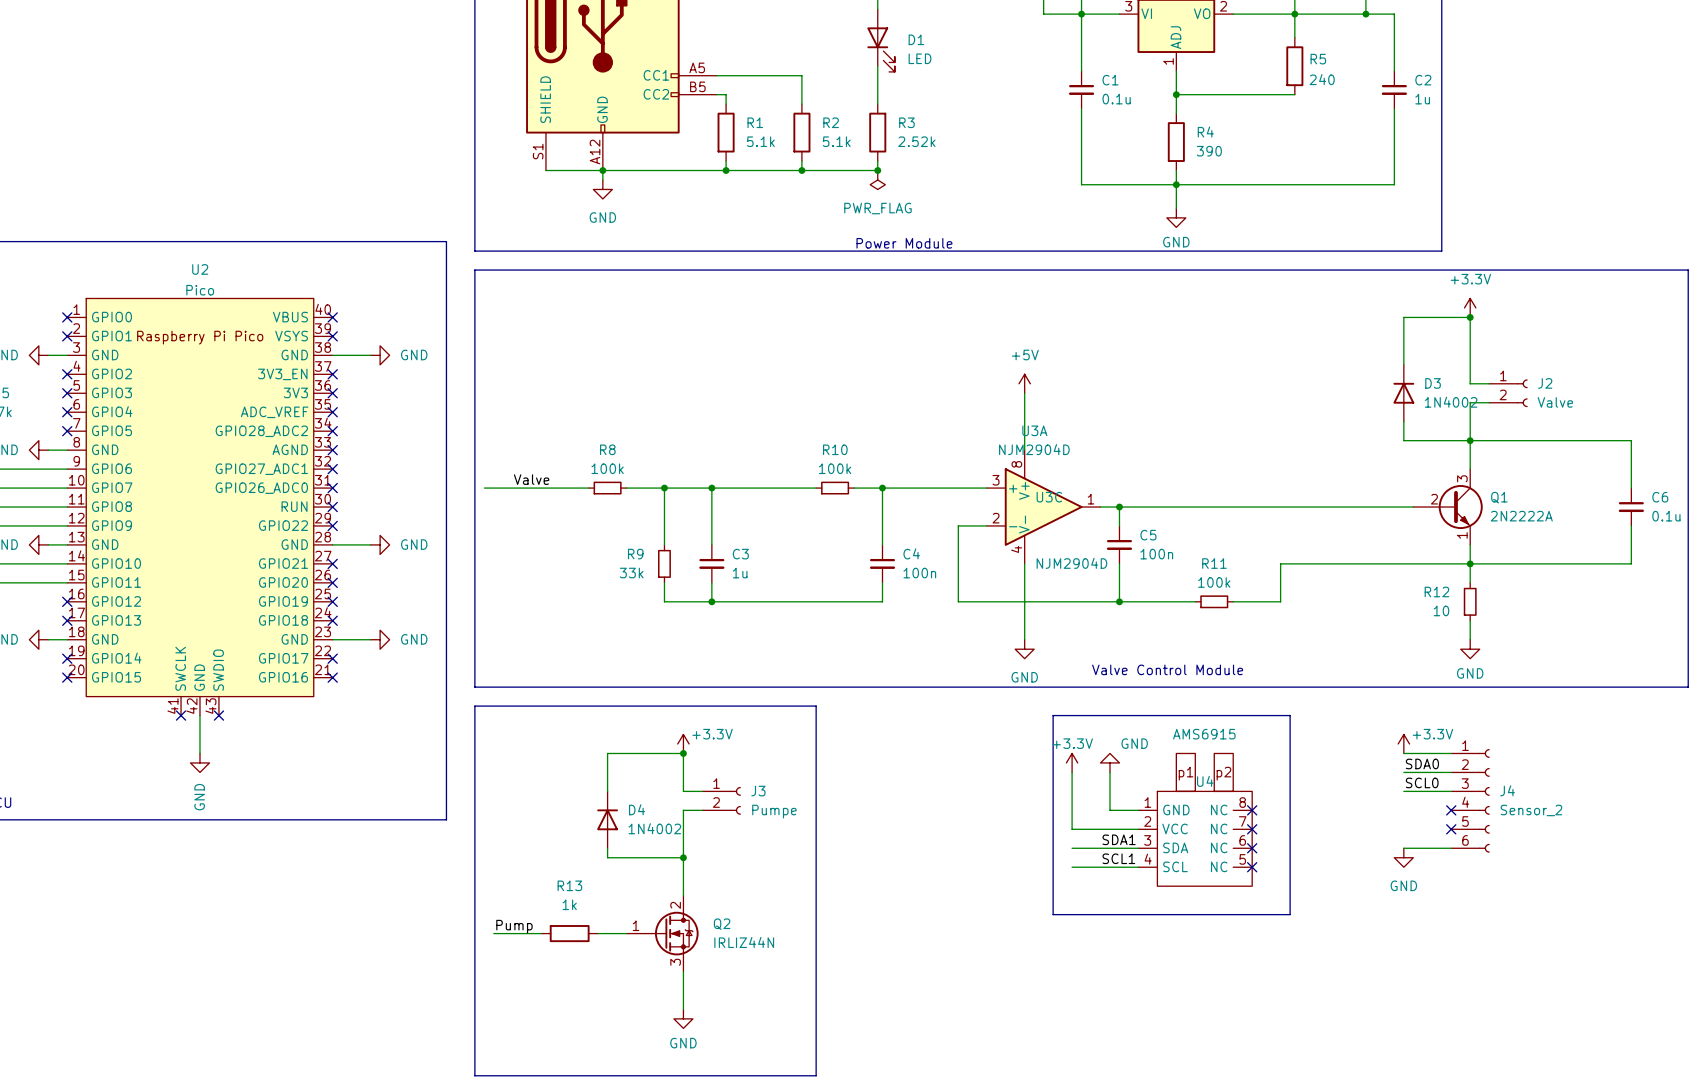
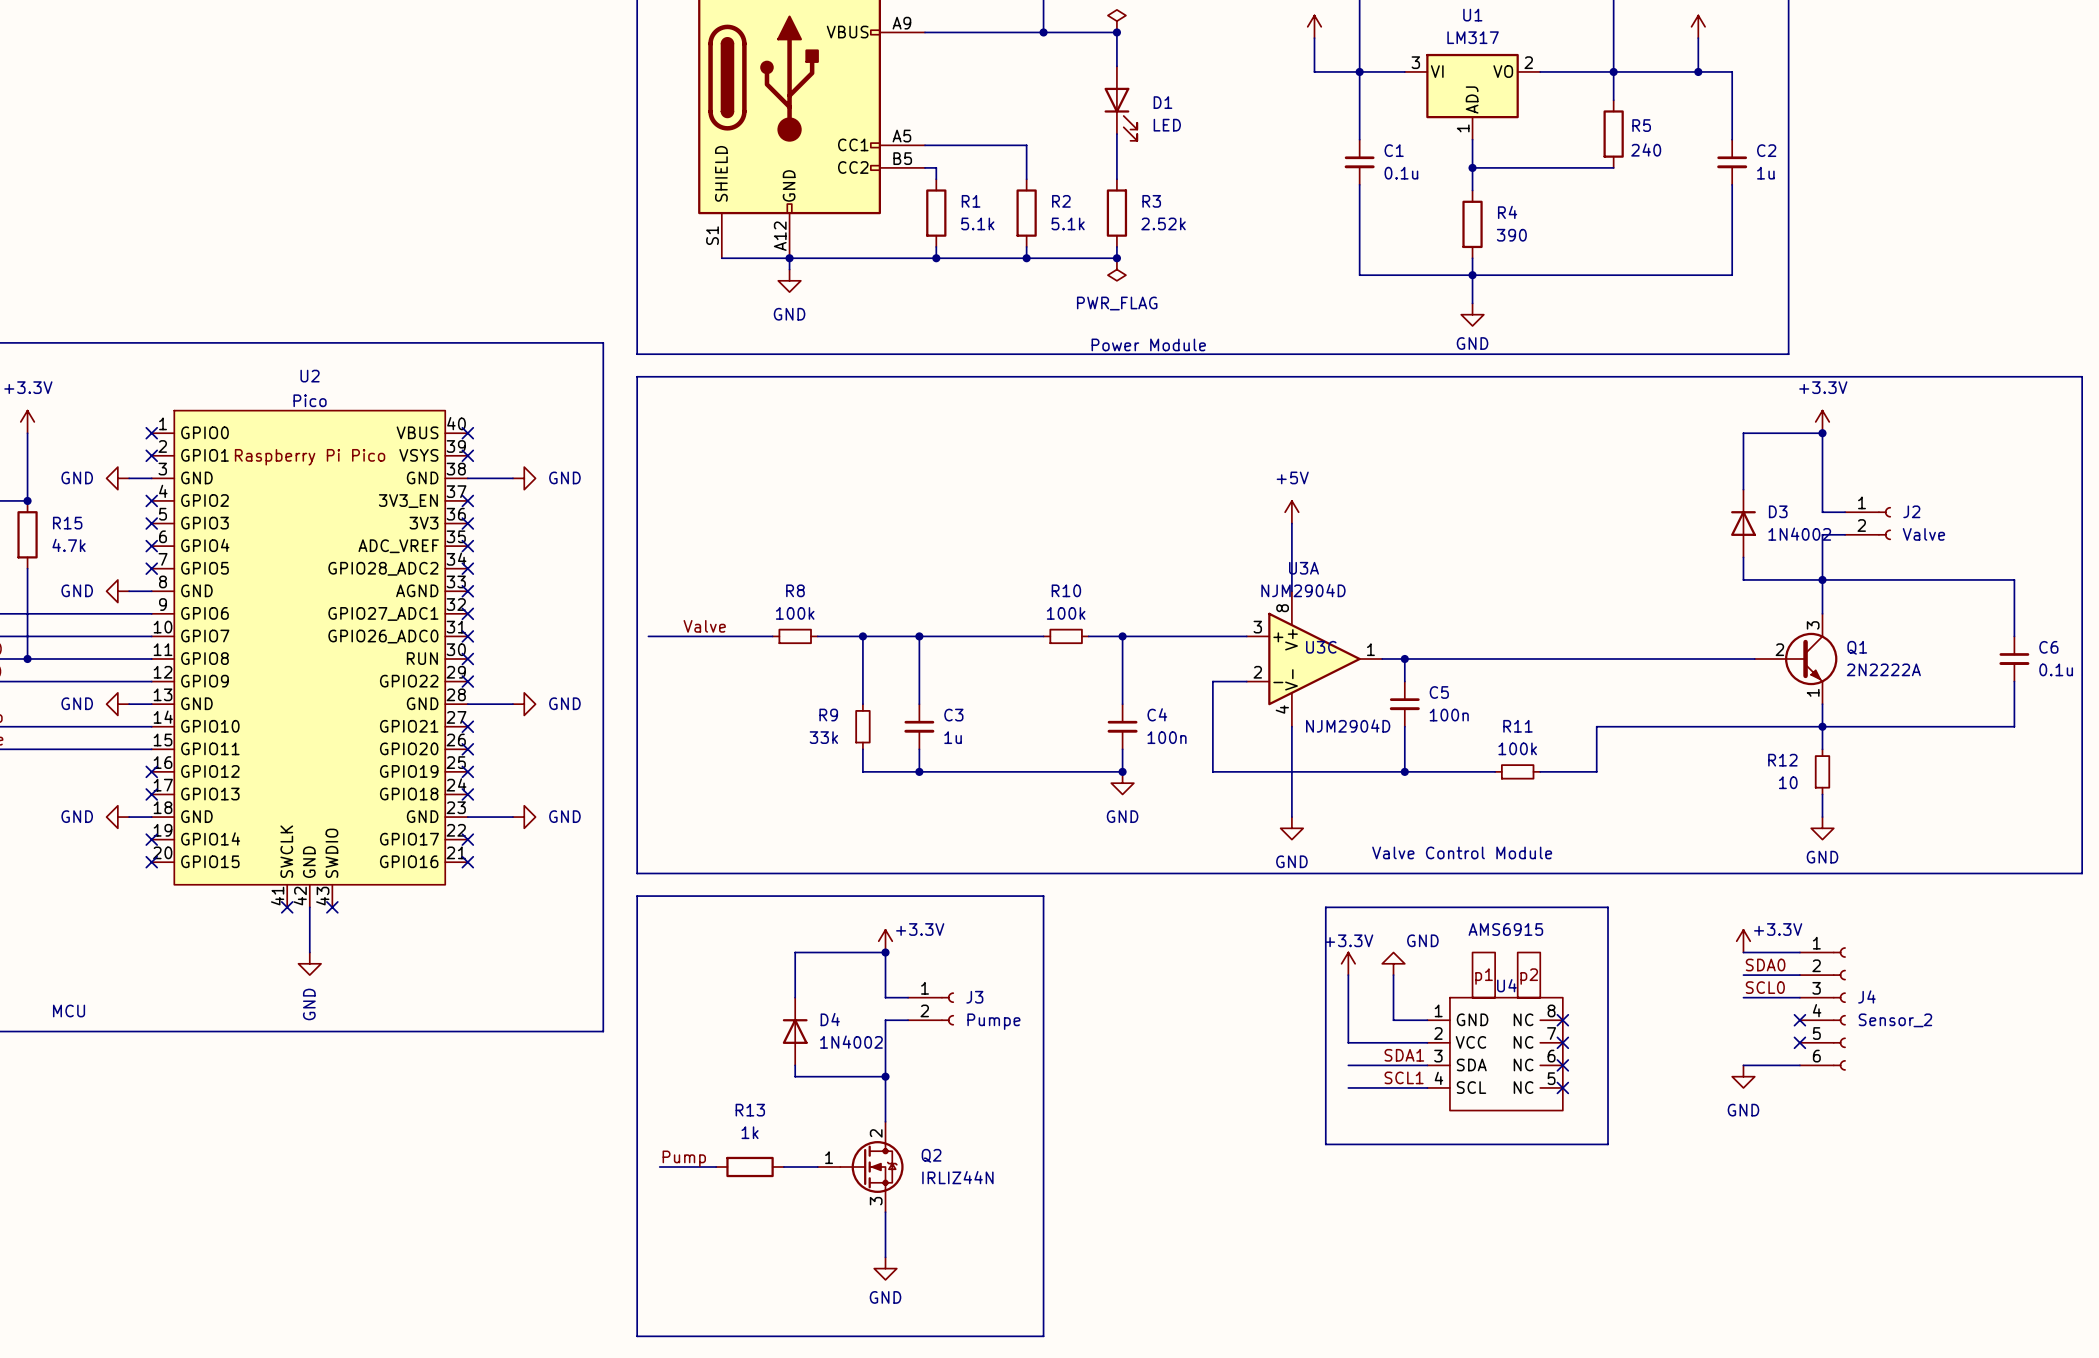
junction: none -> (1122, 771)
power symbol: none -> GND (1122, 783)

